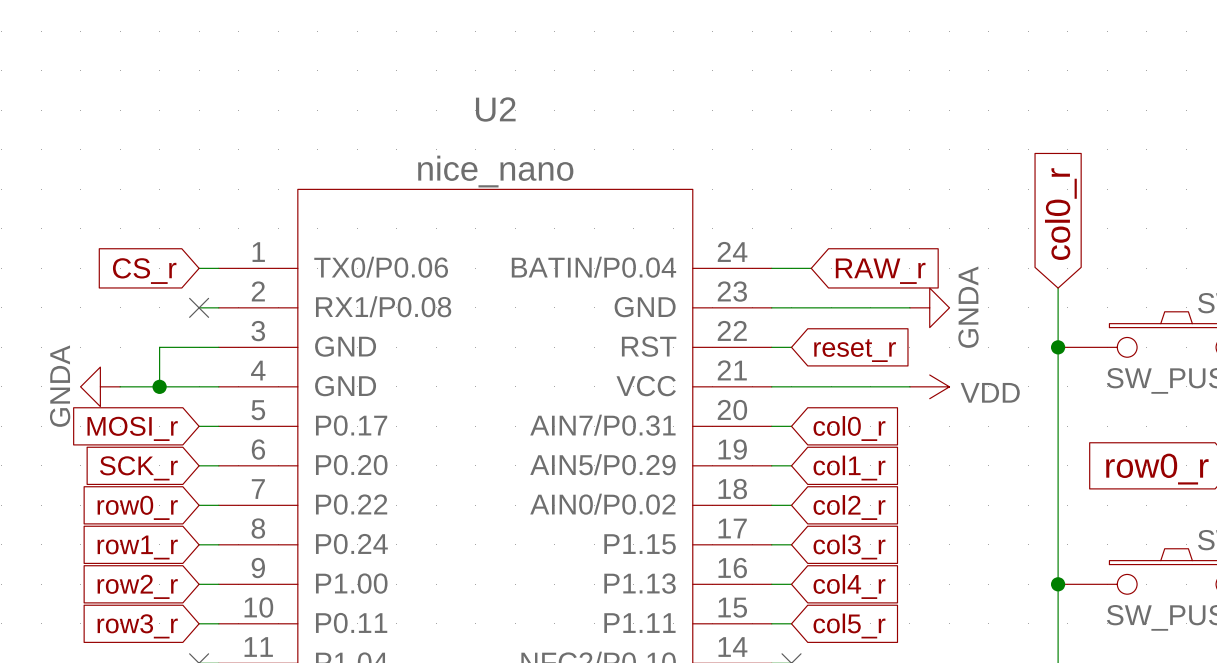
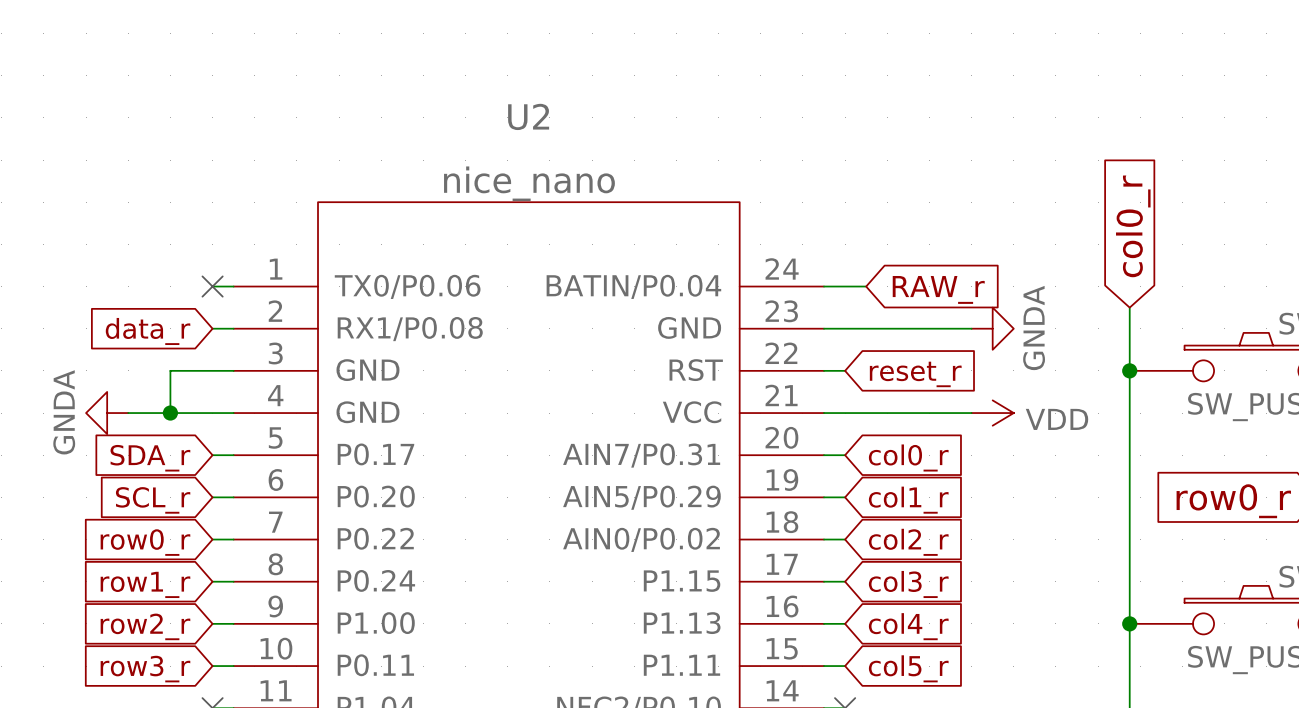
global label: CS_r (144, 271) -> none
no-connect mark position: (199, 307) -> (212, 286)
global label: none -> data_r (148, 331)
global label: MOSI_r (132, 428) -> SDA_r (150, 458)
global label: SCK_r (138, 468) -> SCL_r (153, 500)

